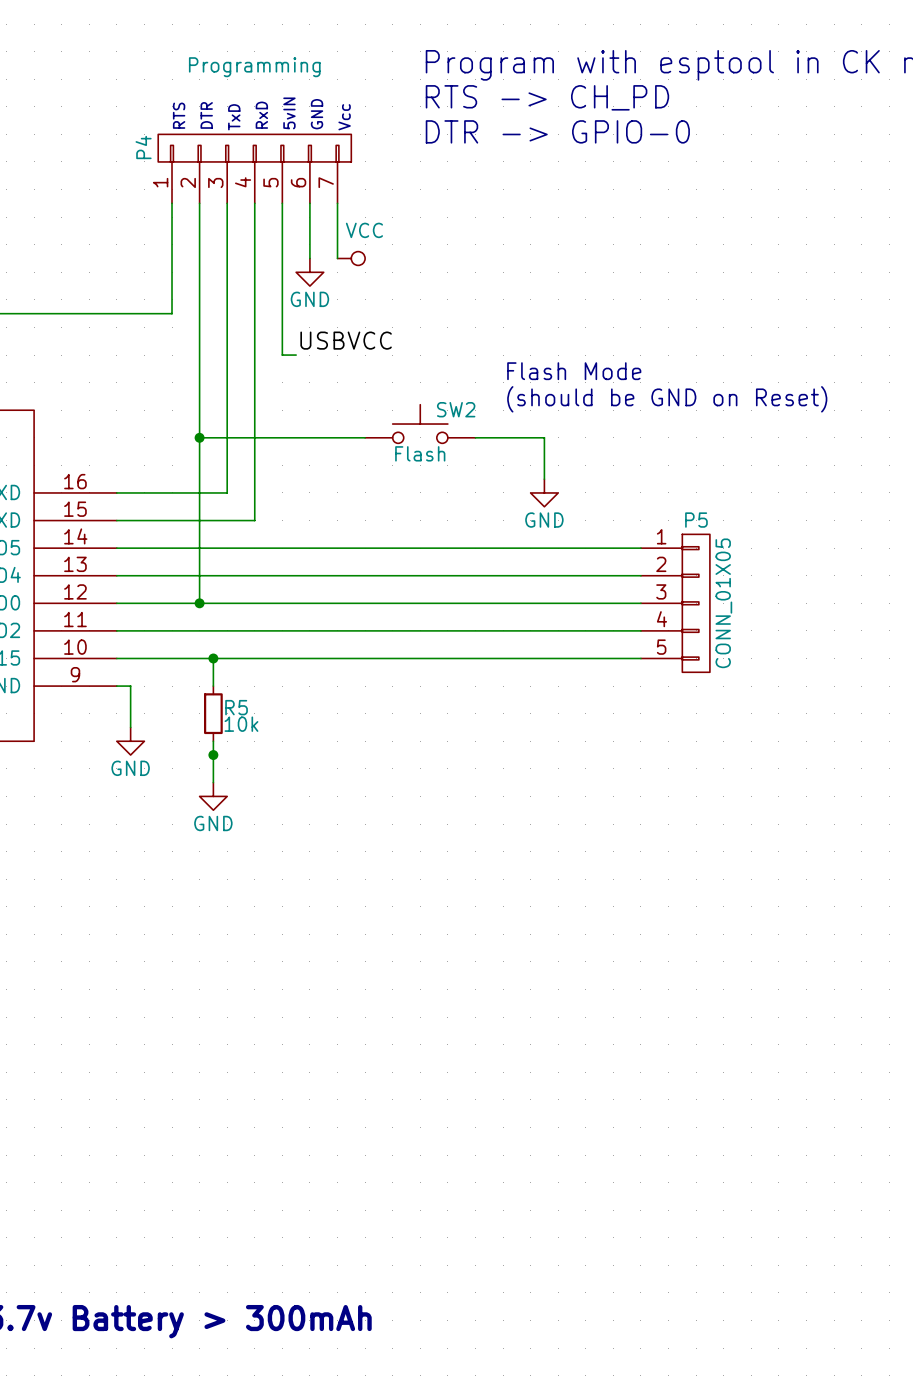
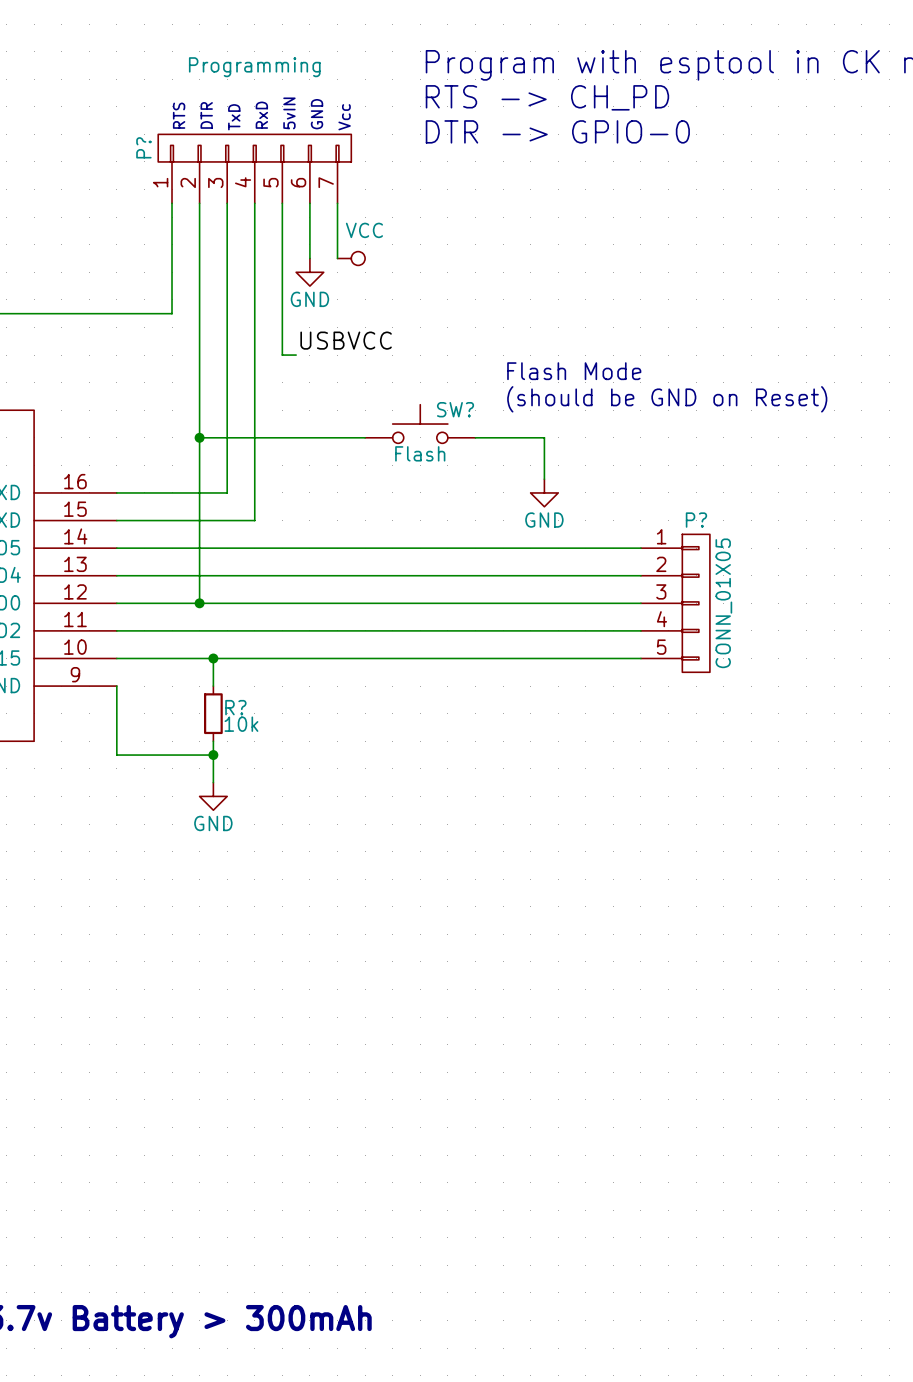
P4 name: P4 (143, 147) -> P? (143, 147)
SW2 name: SW2 (456, 409) -> SW? (455, 409)
P5 name: P5 (696, 520) -> P? (696, 520)
wire: (116, 686) (130, 686) (130, 727) -> (116, 686) (116, 755) (213, 755)
R5 name: R5 (236, 707) -> R? (235, 707)
power symbol: GND (130, 741) -> none

